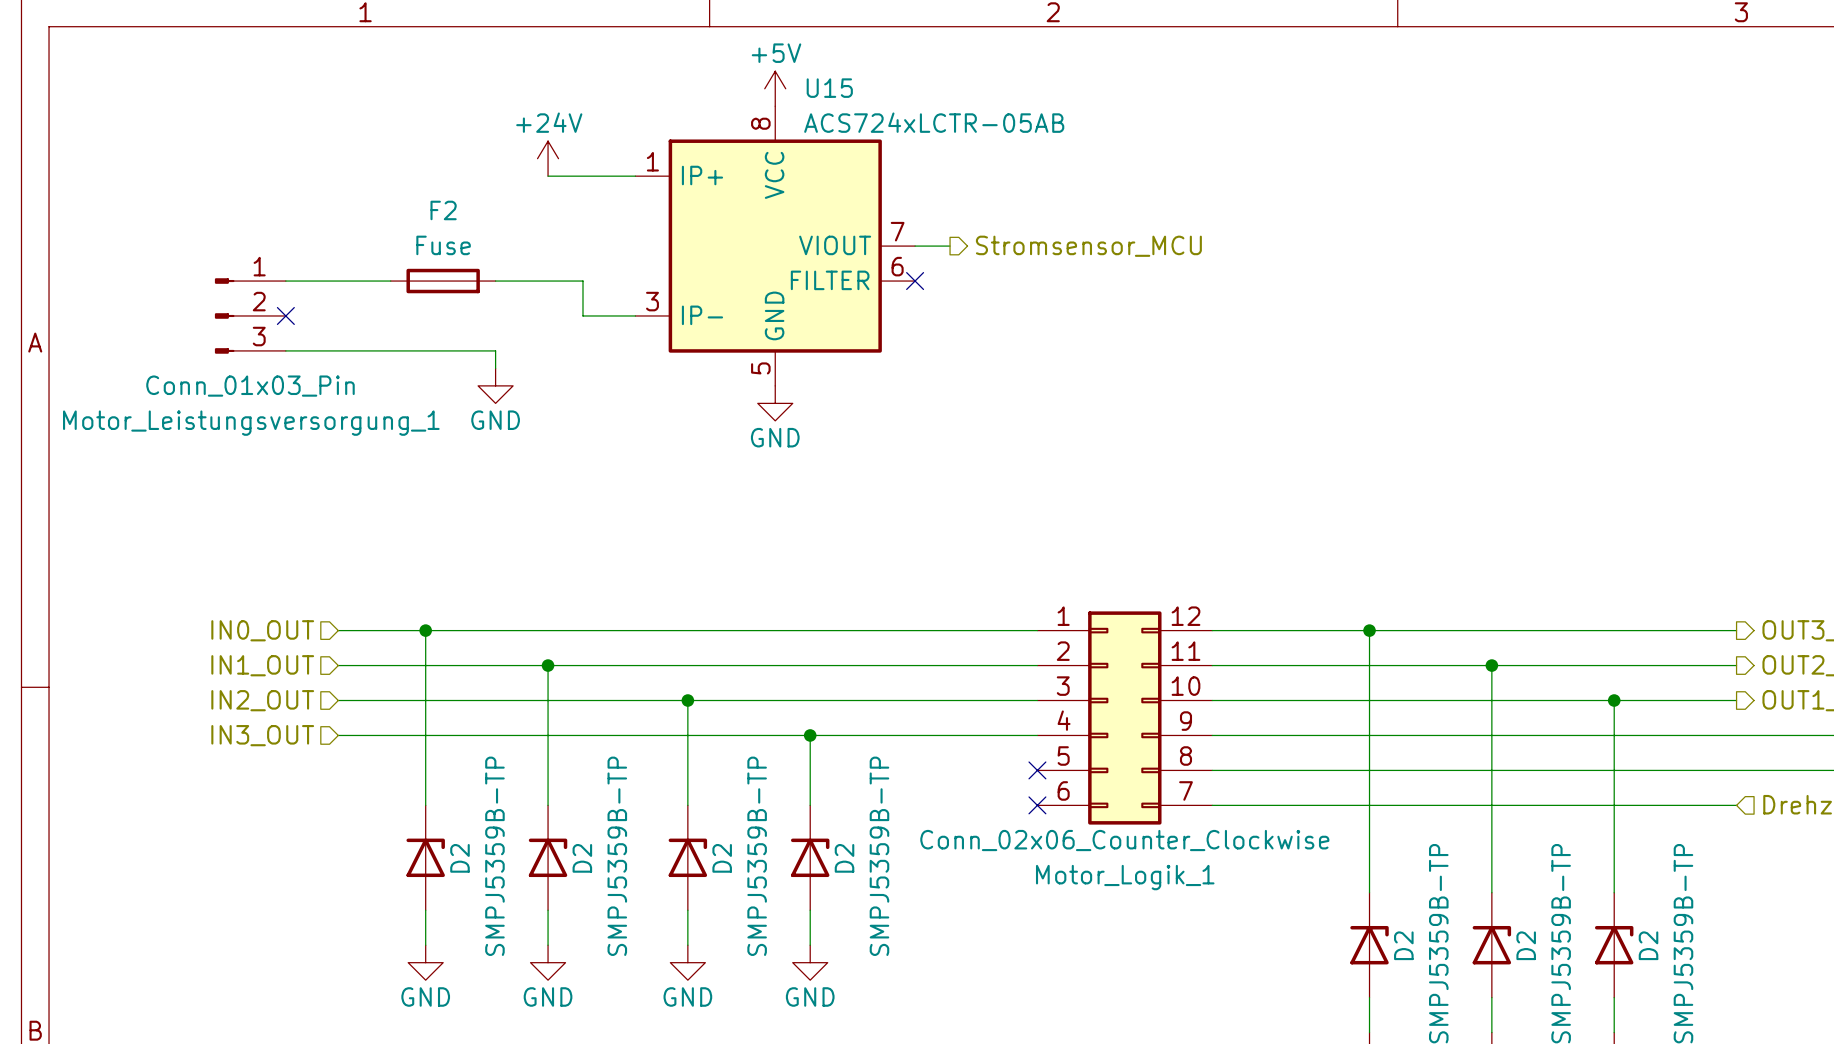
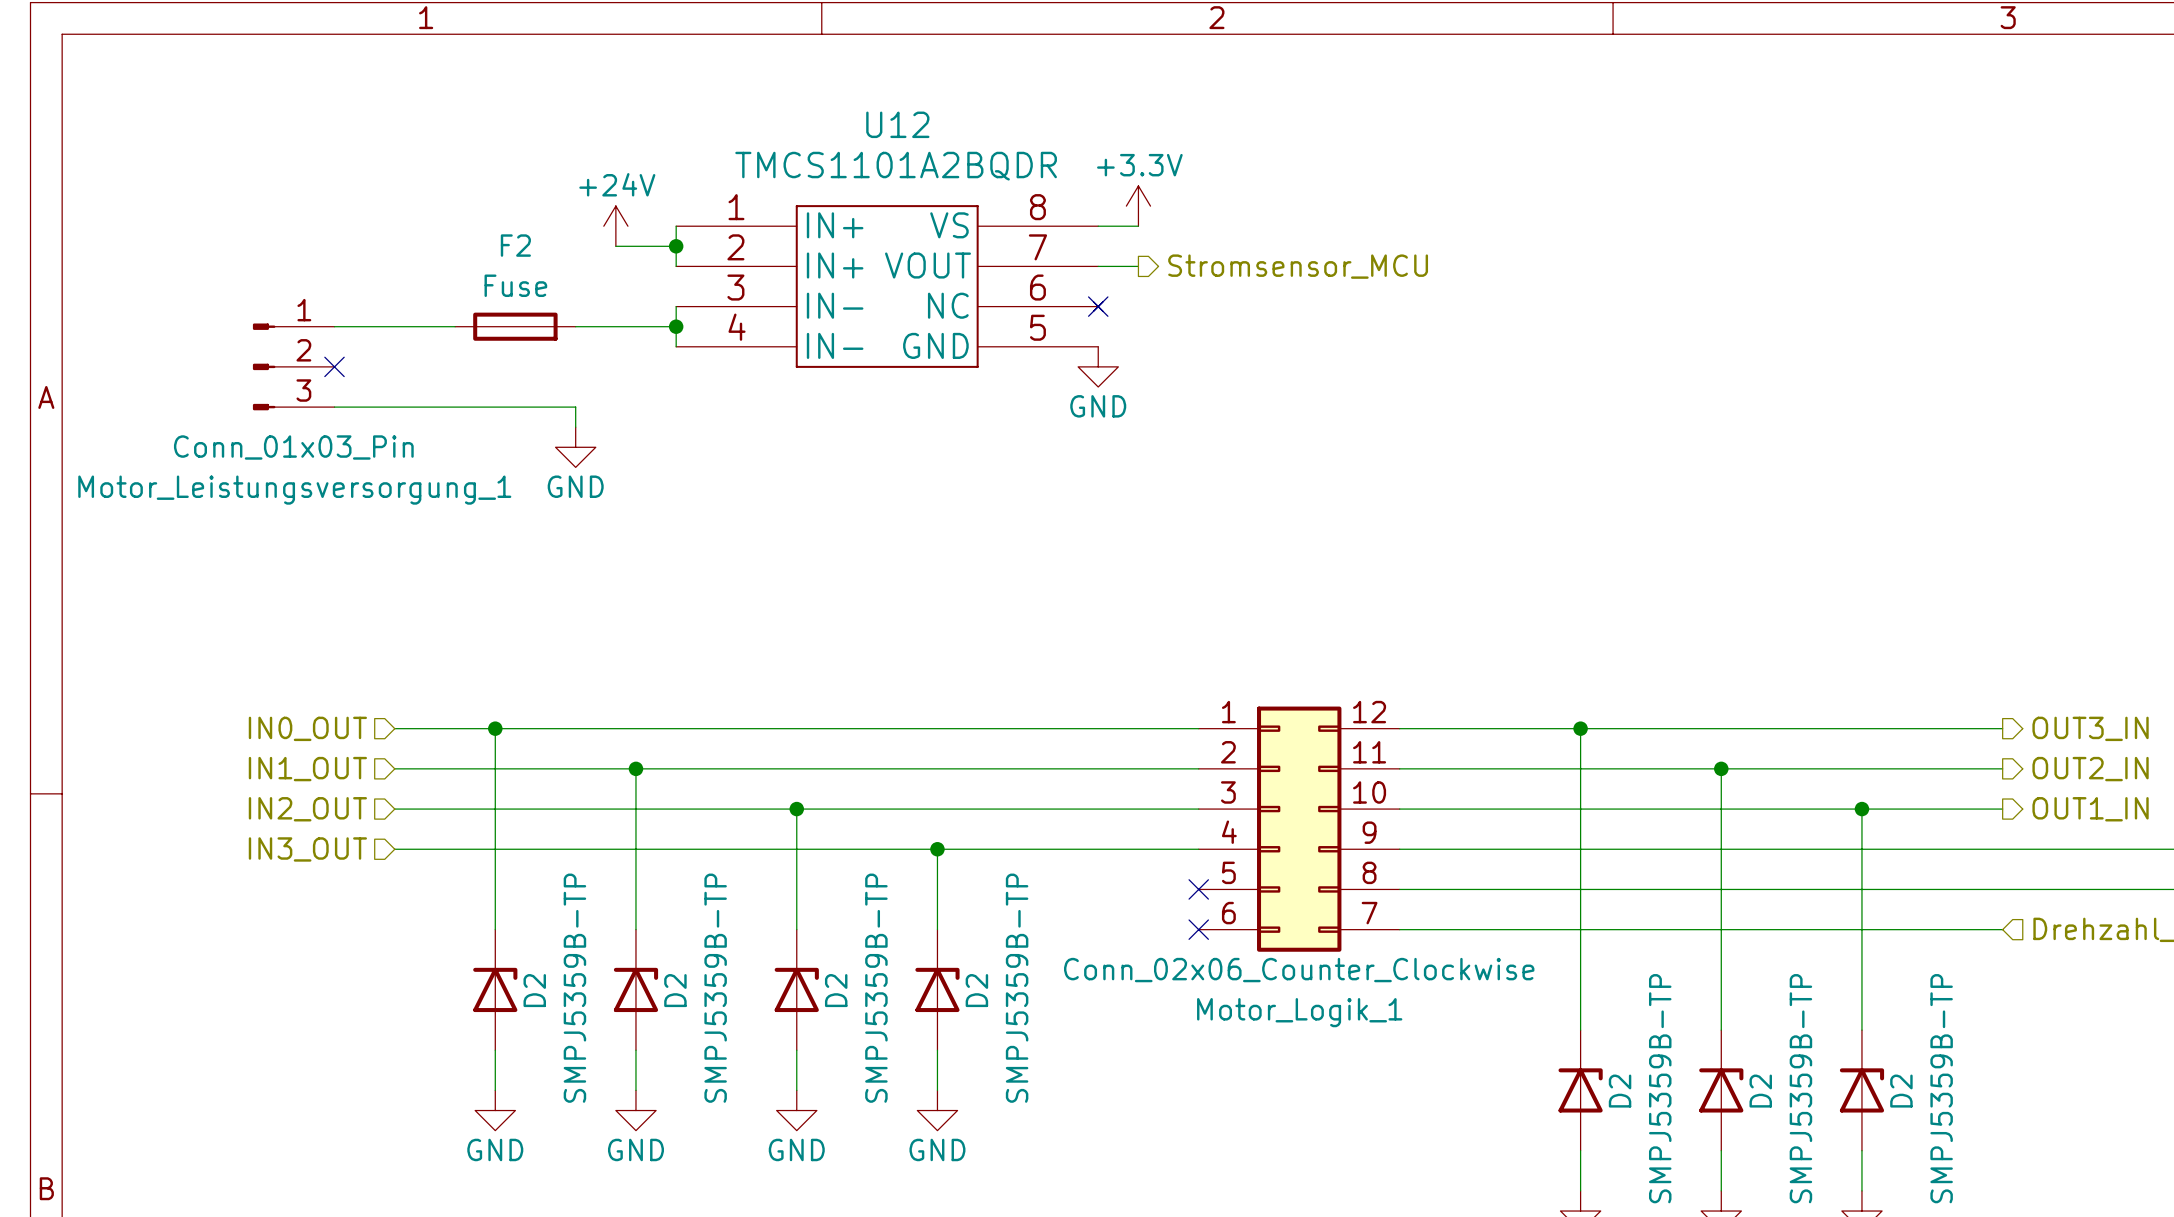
power symbol: +5V (775, 88) -> none
power symbol position: +24V (548, 158) -> +24V (615, 226)
wire: (548, 176) (635, 176) -> none
power symbol: none -> +3.3V (1138, 206)
wire: none -> (676, 226) (676, 266)
wire: none -> (1098, 226) (1138, 226)
wire: none -> (615, 246) (676, 246)
junction: none -> (676, 246)
U12: none -> TMCS1101A2BQDR (889, 286)
U15: ACS724xLCTR-05AB (775, 246) -> none
wire: (915, 246) (950, 246) -> (1098, 266) (1138, 266)
hierarchical label position: Stromsensor_MCU (1088, 246) -> Stromsensor_MCU (1298, 266)
wire: none -> (676, 306) (676, 326)
junction: none -> (676, 326)
no-connect mark position: (915, 281) -> (1098, 306)
wire: (582, 298) (582, 315) (635, 315) -> none
power symbol position: GND (775, 403) -> GND (1098, 366)

